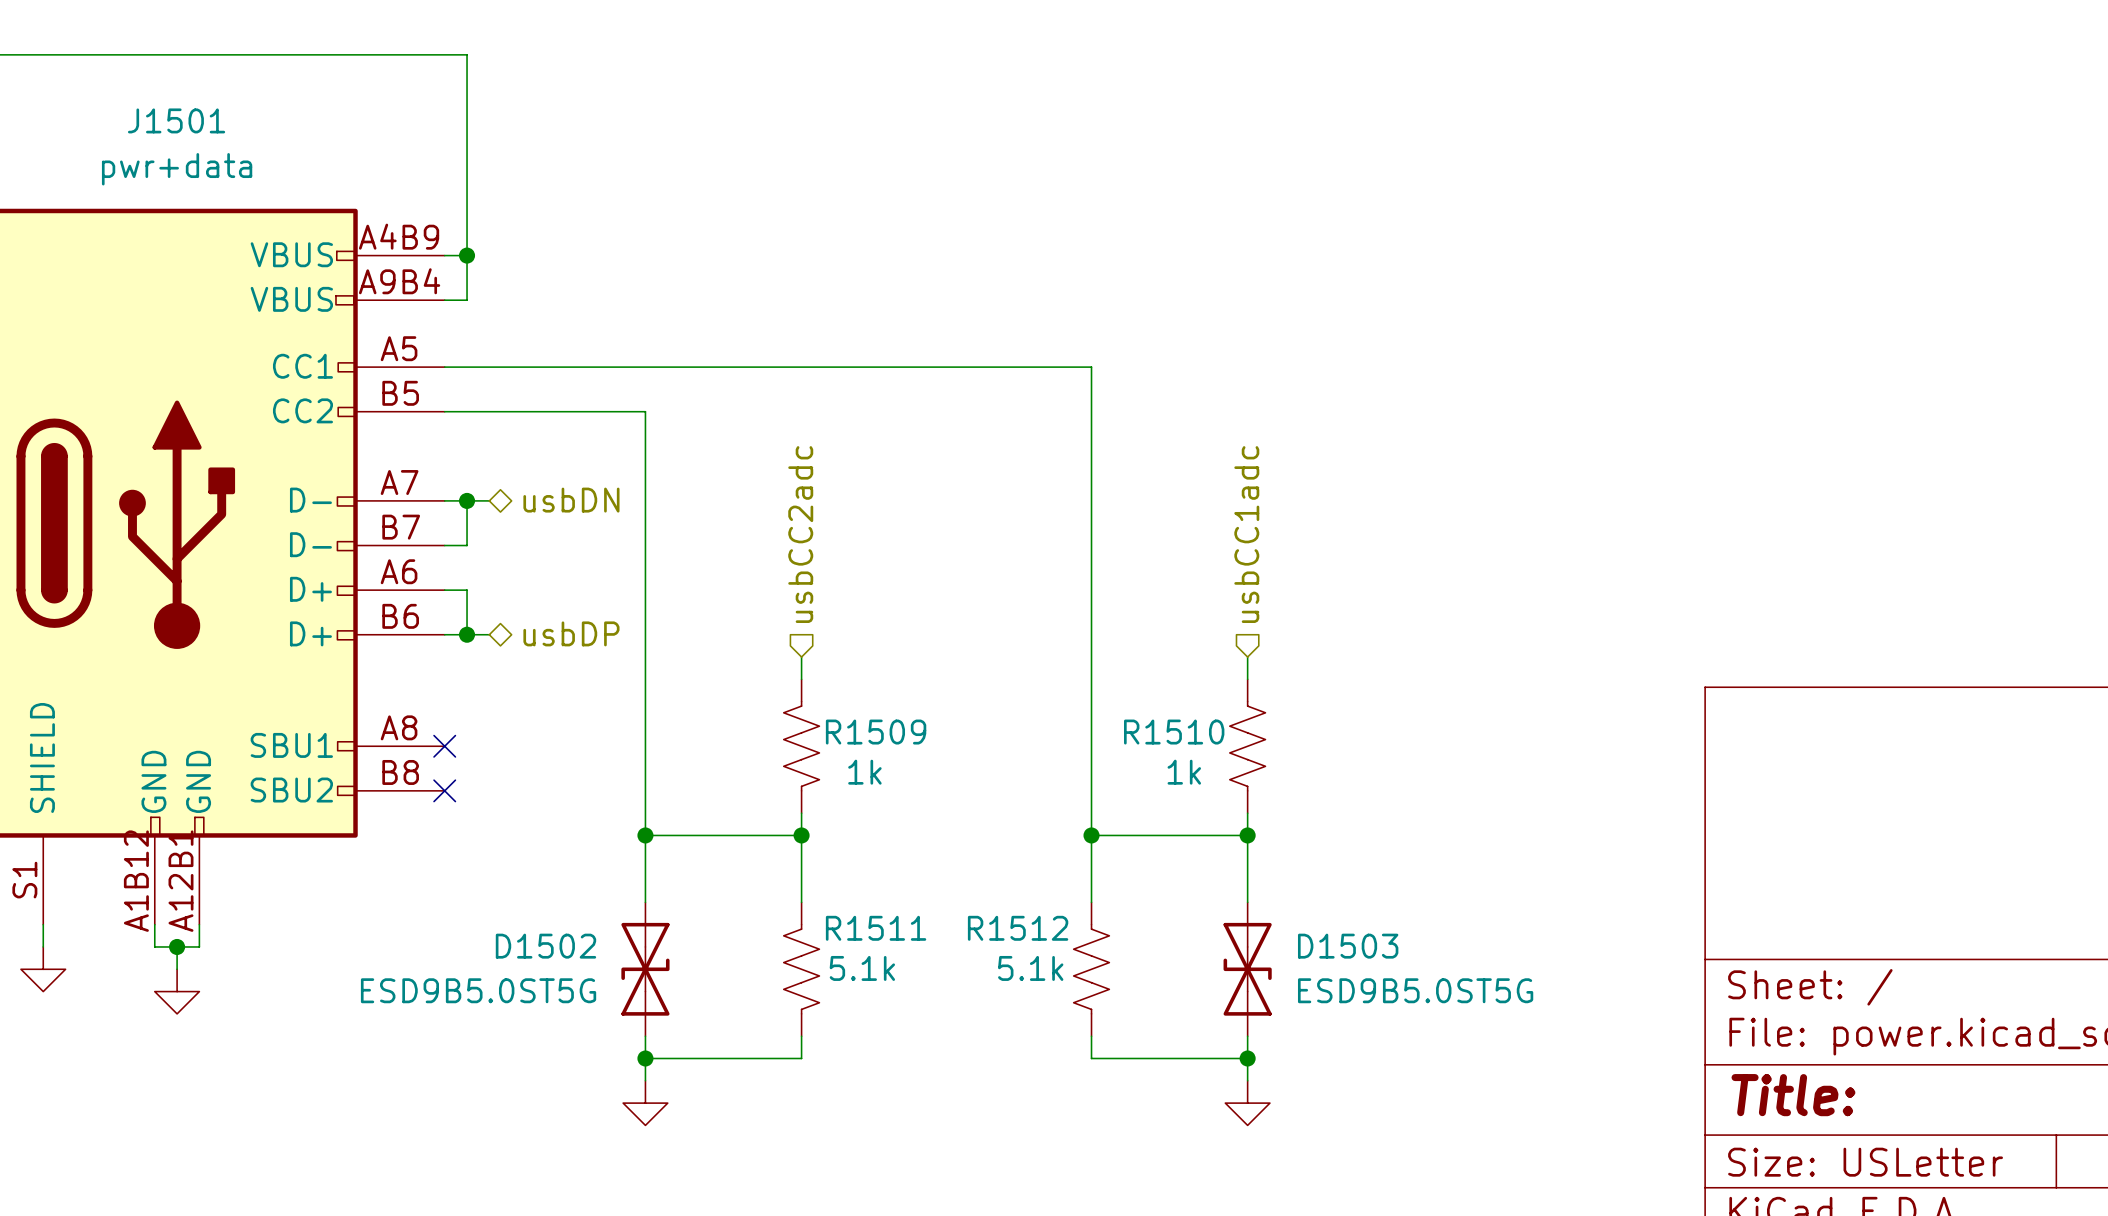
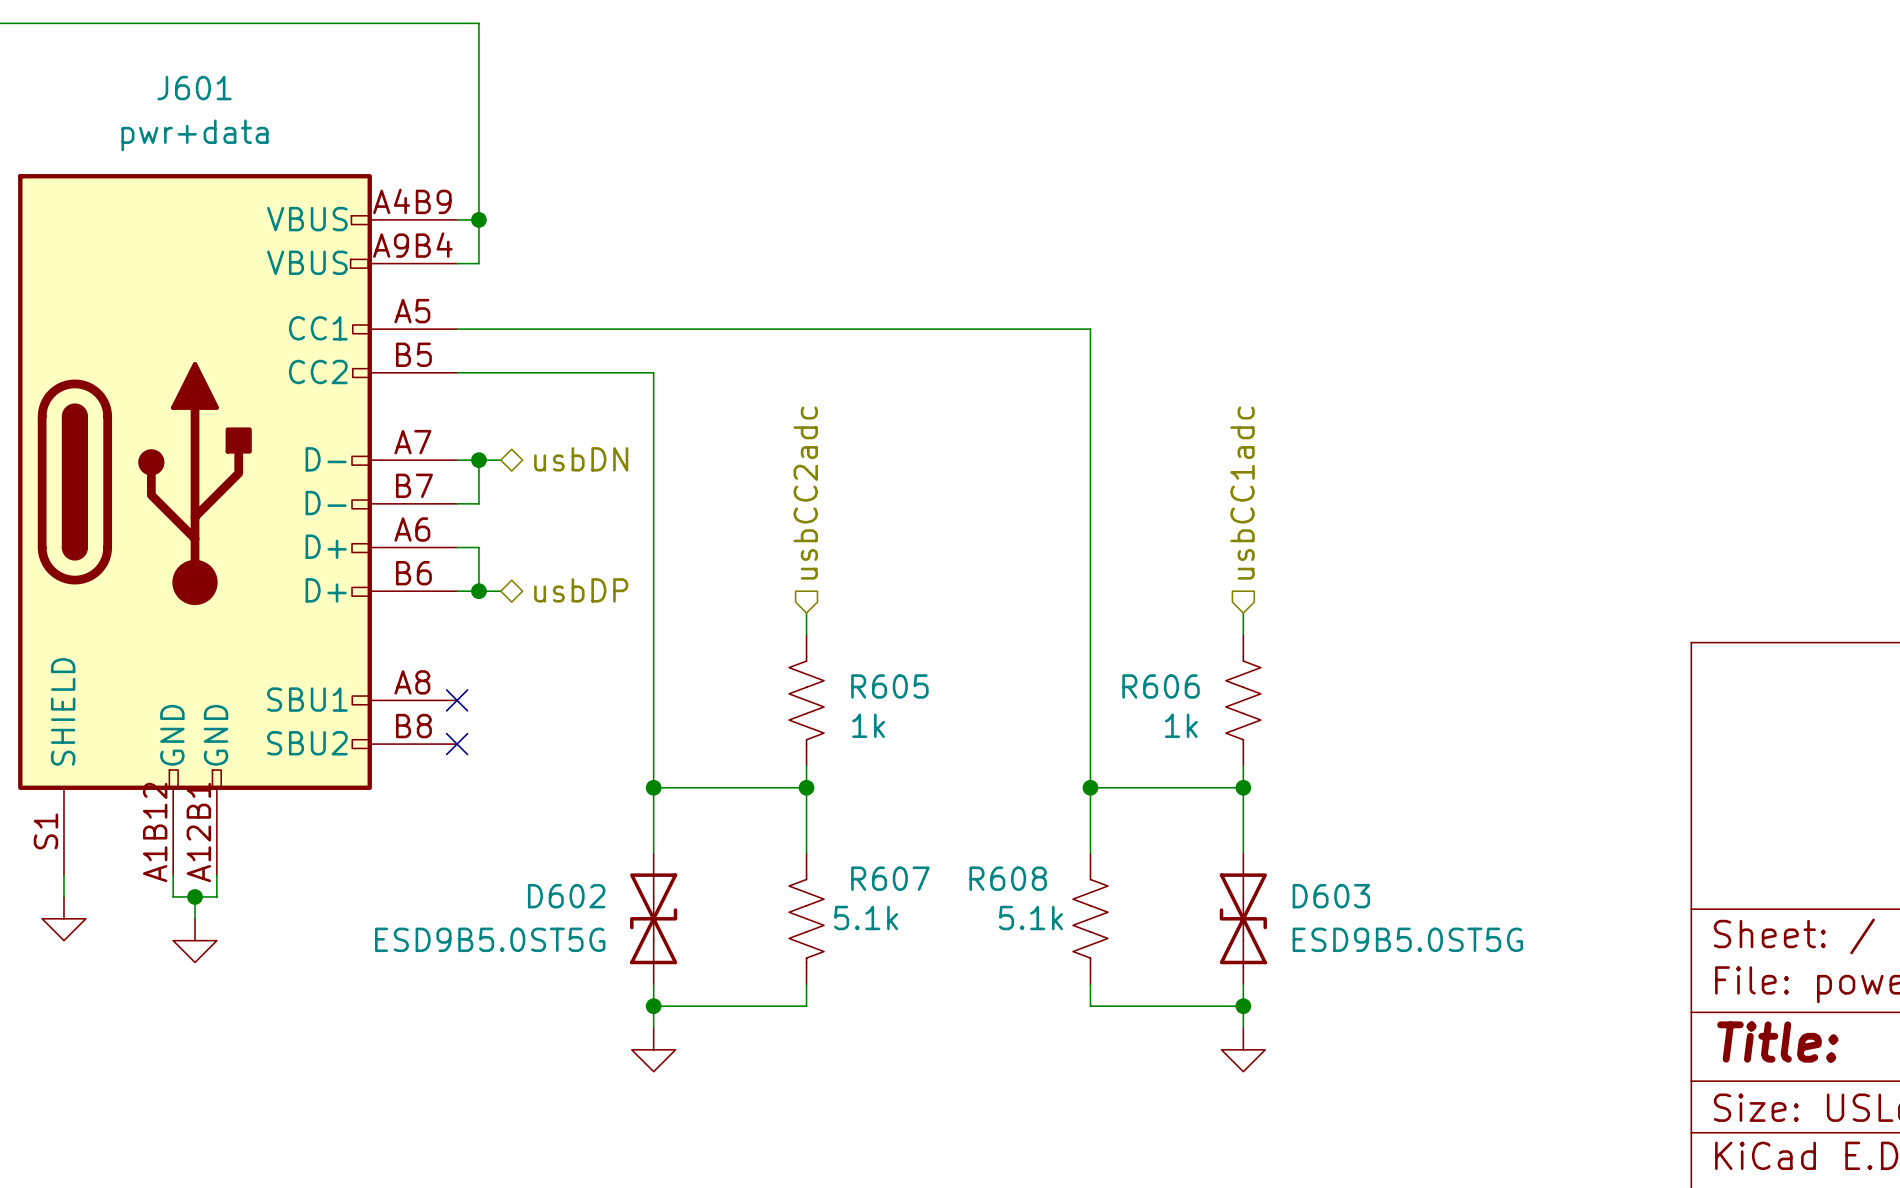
J1501 name: J1501 (176, 120) -> J601 (194, 88)
R1509 name: R1509 (876, 732) -> R605 (889, 686)
R1510 name: R1510 (1174, 732) -> R606 (1161, 686)
R1511 name: R1511 (876, 928) -> R607 (890, 878)
R1512 name: R1512 (1018, 928) -> R608 (1008, 878)
D1502 name: D1502 (545, 946) -> D602 (566, 896)
D1503 name: D1503 (1348, 946) -> D603 (1331, 896)

